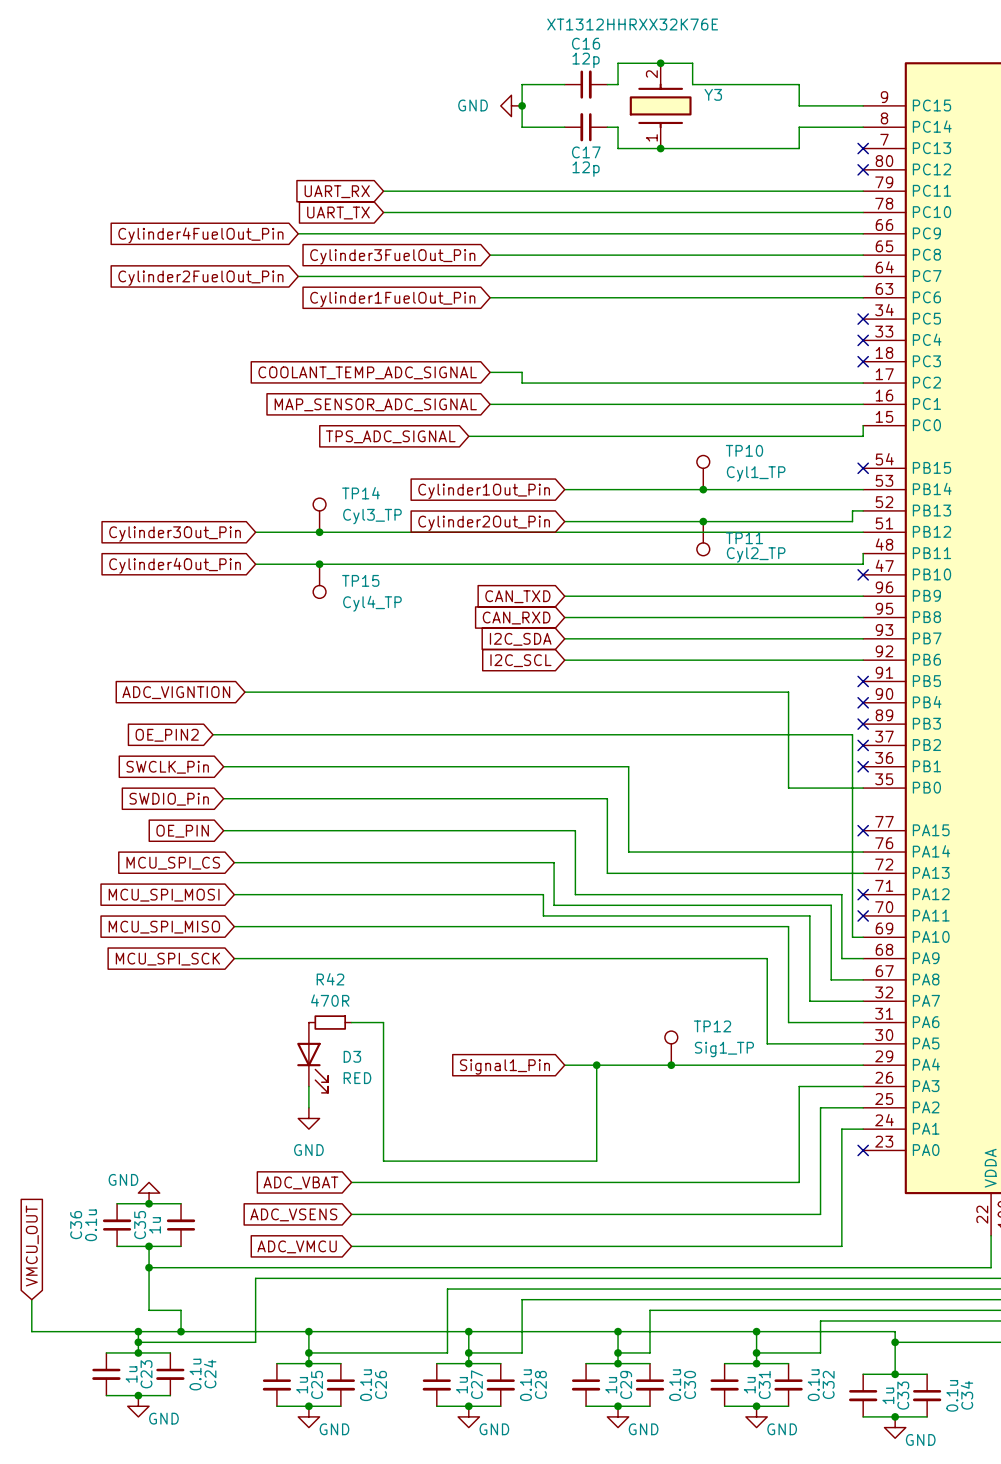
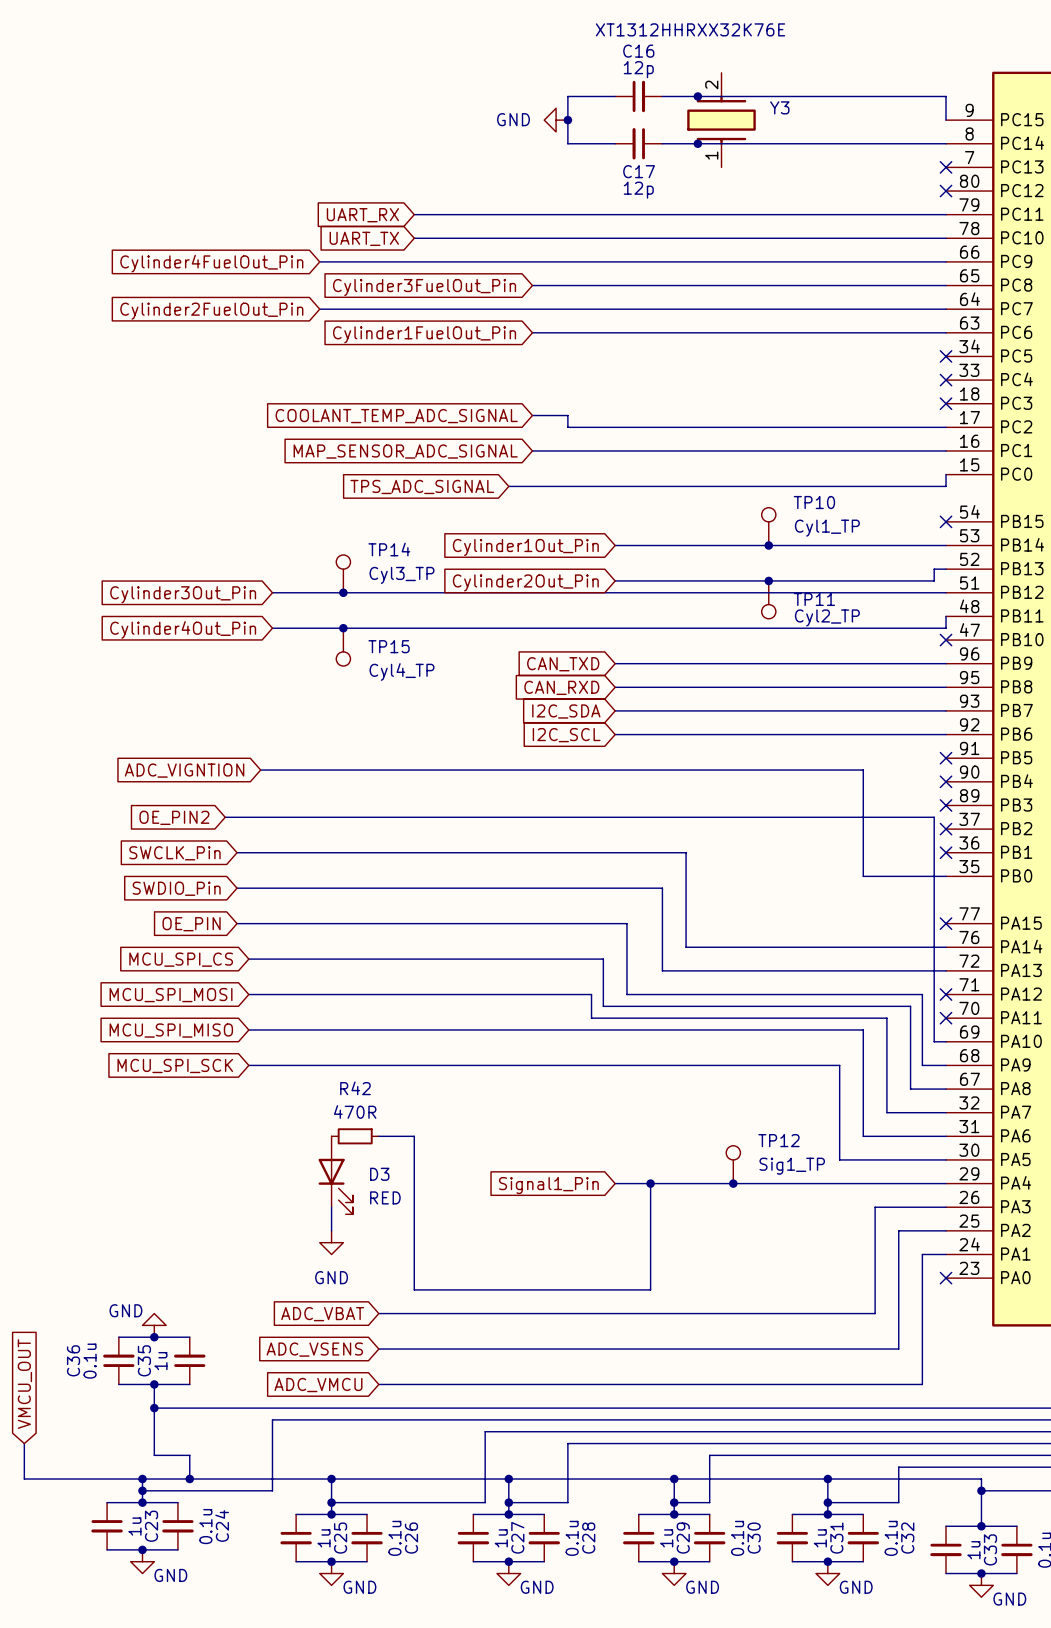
junction position: (660, 63) -> (697, 96)
wire: (618, 84) (618, 63) (692, 63) (692, 84) -> (674, 96) (756, 96)
wire: (799, 84) (799, 105) (863, 105) -> (875, 96) (946, 96) (946, 120)
wire: (618, 127) (618, 148) (799, 148) (799, 127) -> (674, 143) (875, 143)
junction position: (660, 148) -> (697, 143)

